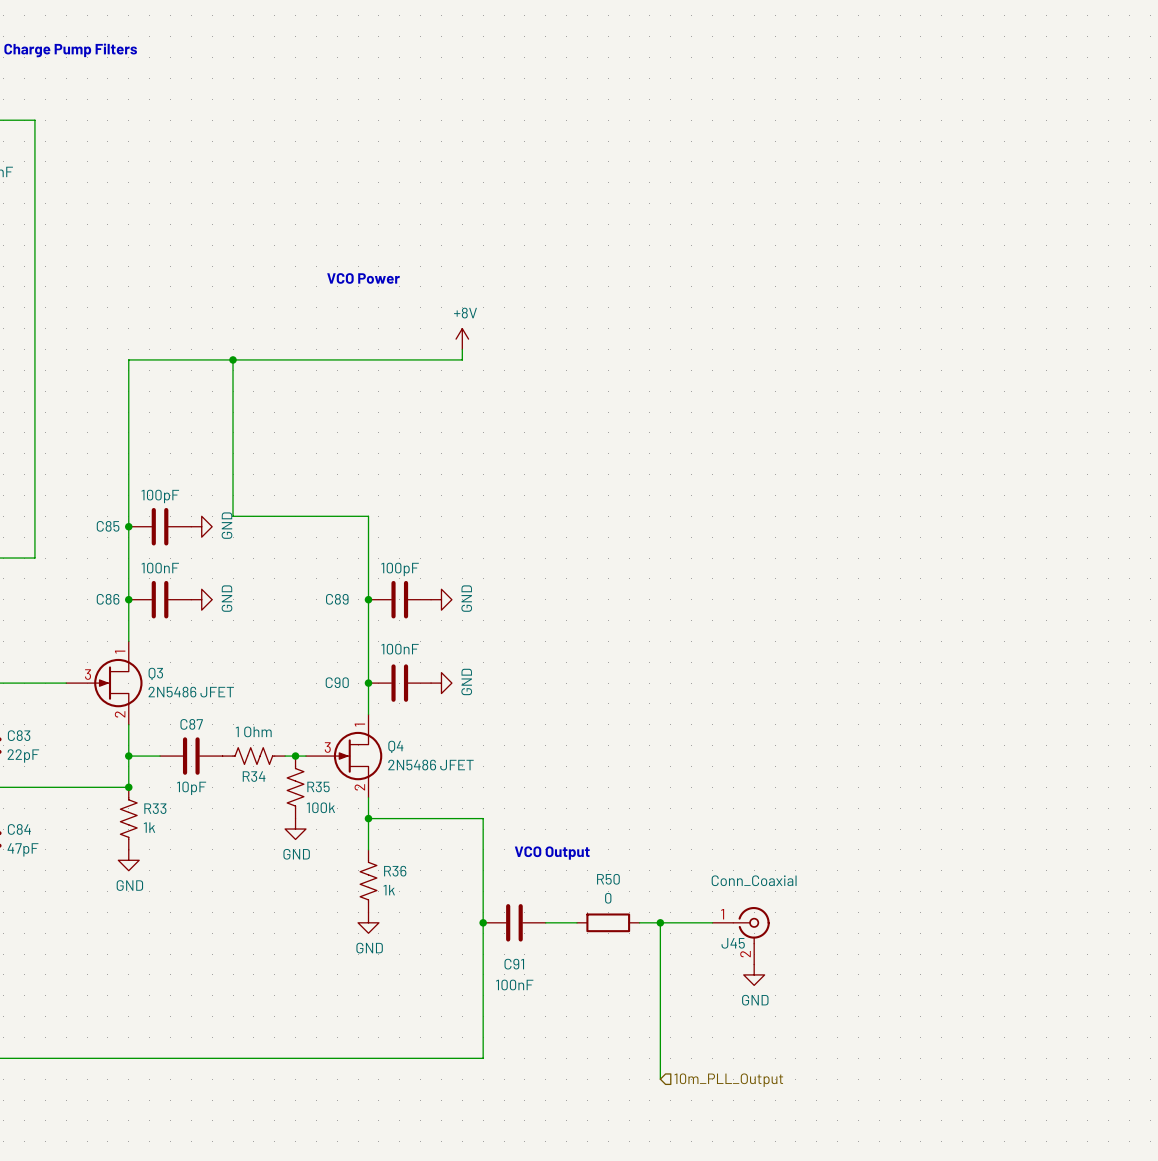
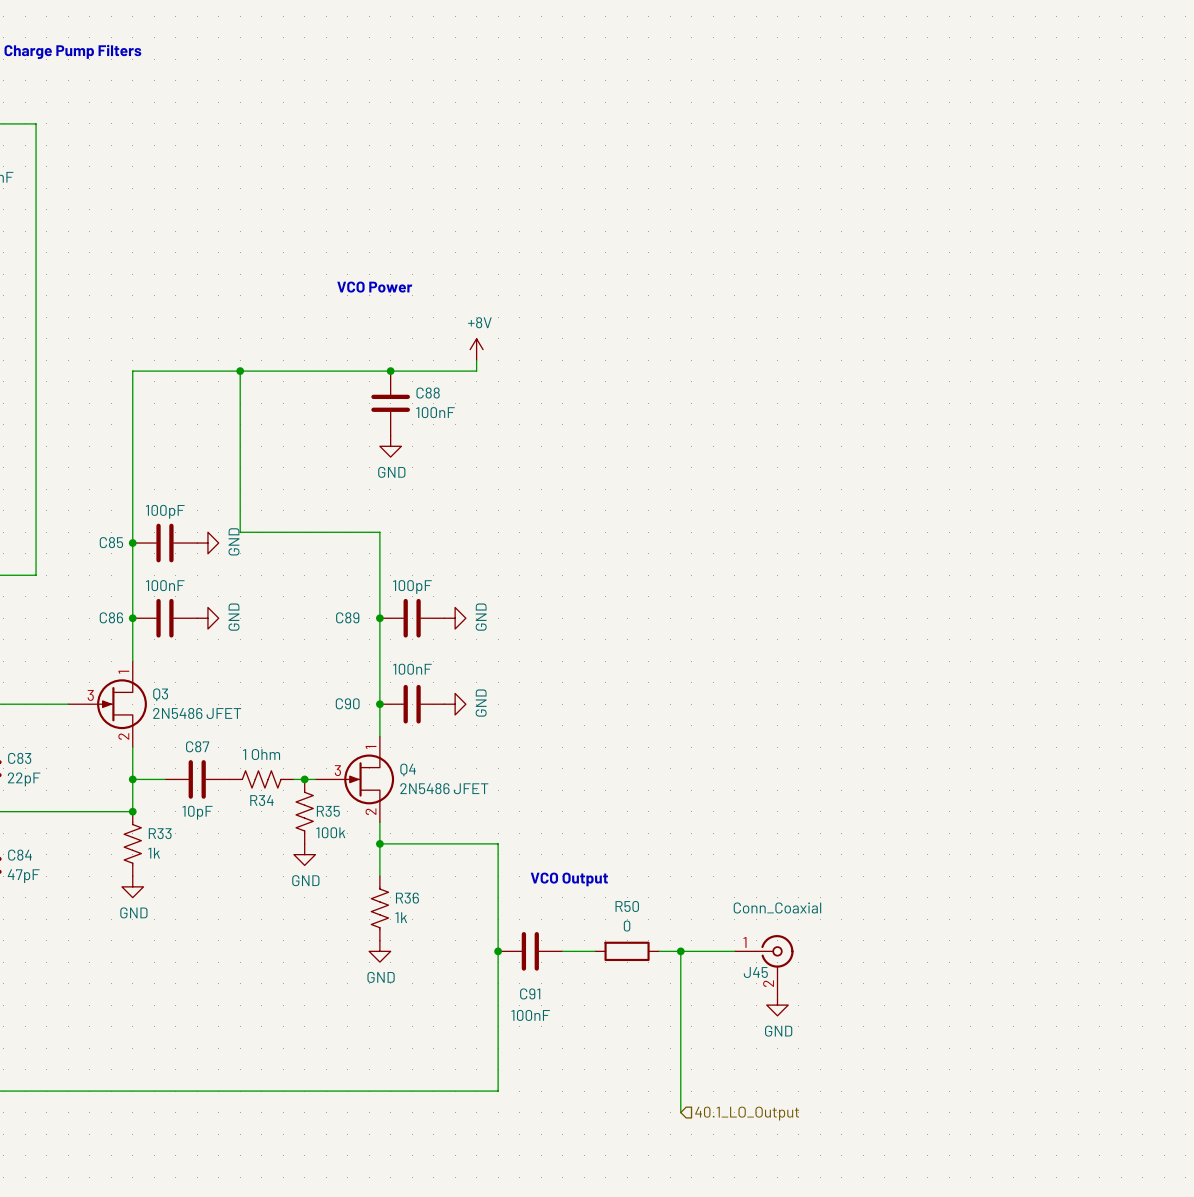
junction: none -> (390, 371)
C88: none -> 100nF (390, 403)
power symbol: none -> GND (390, 446)
hierarchical label: 10m_PLL_Output (728, 1080) -> 40.1_LO_Output (747, 1113)

